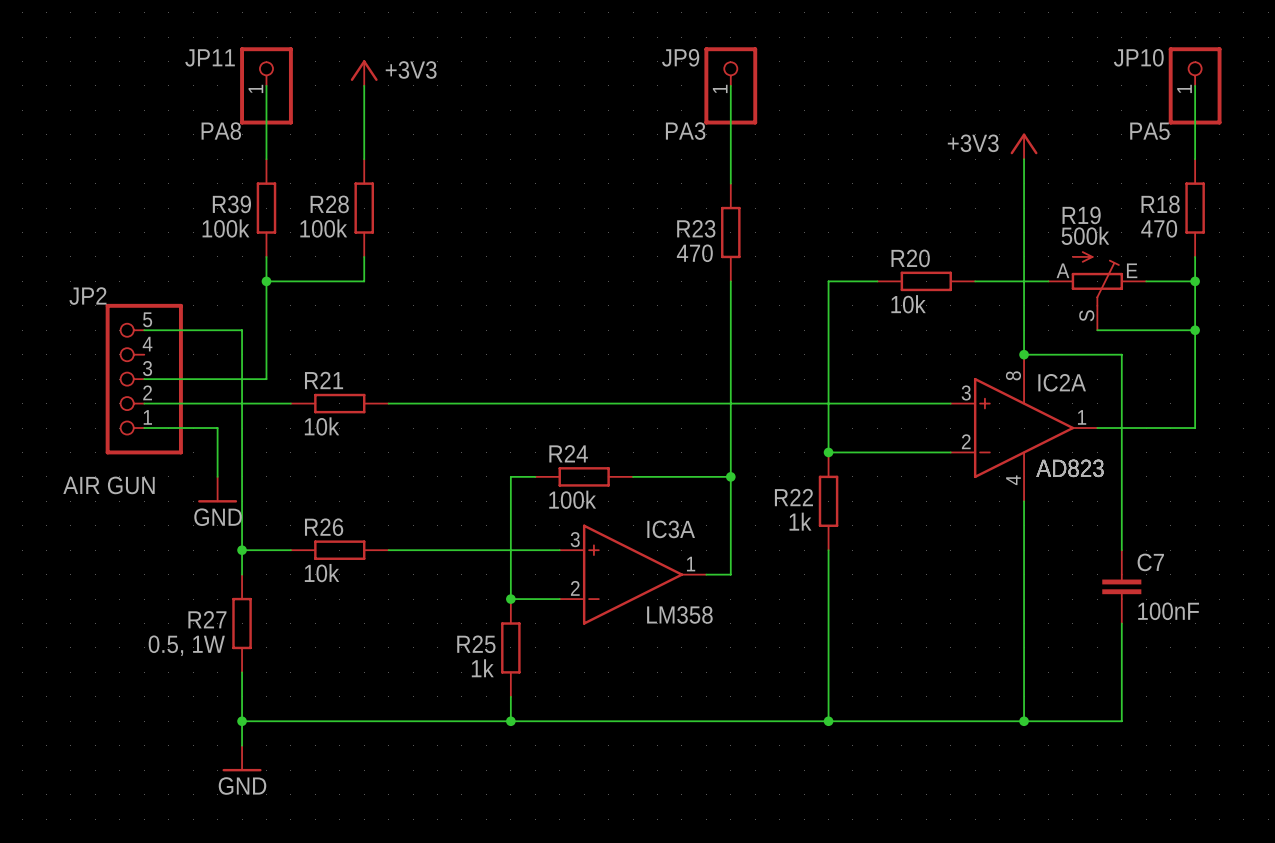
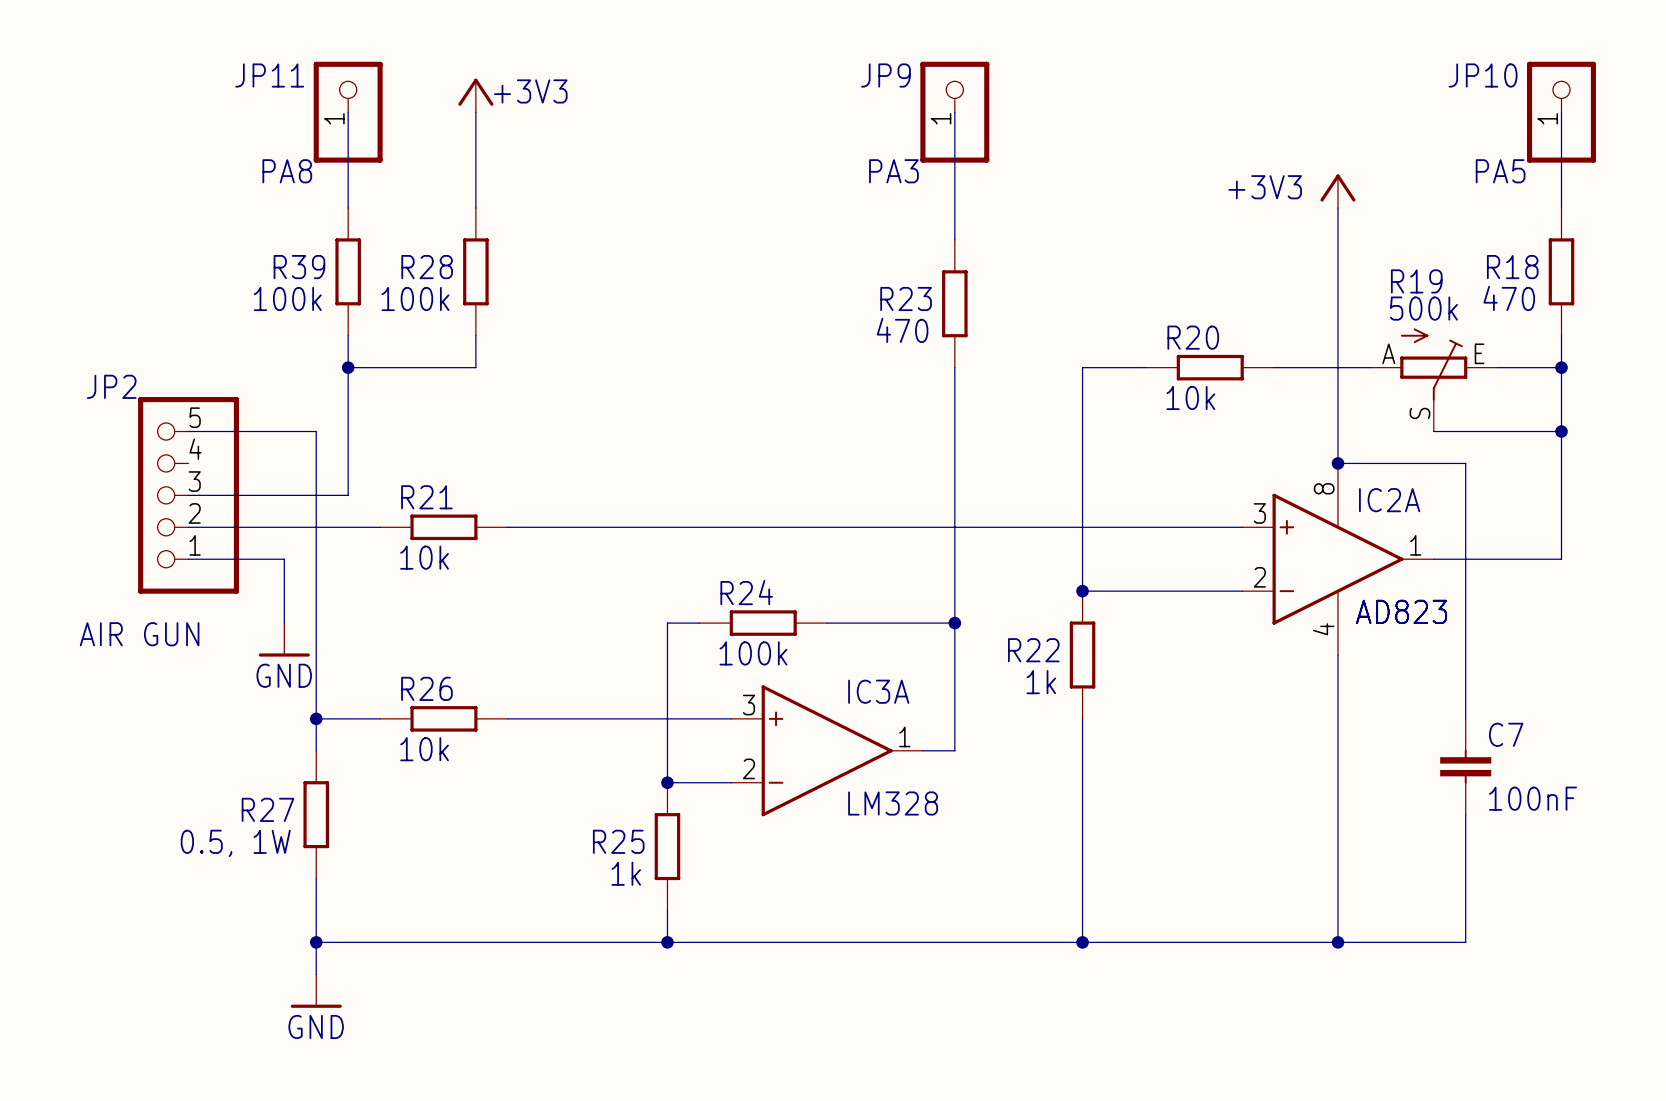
IC3A value: LM358 (679, 614) -> LM328 (893, 803)

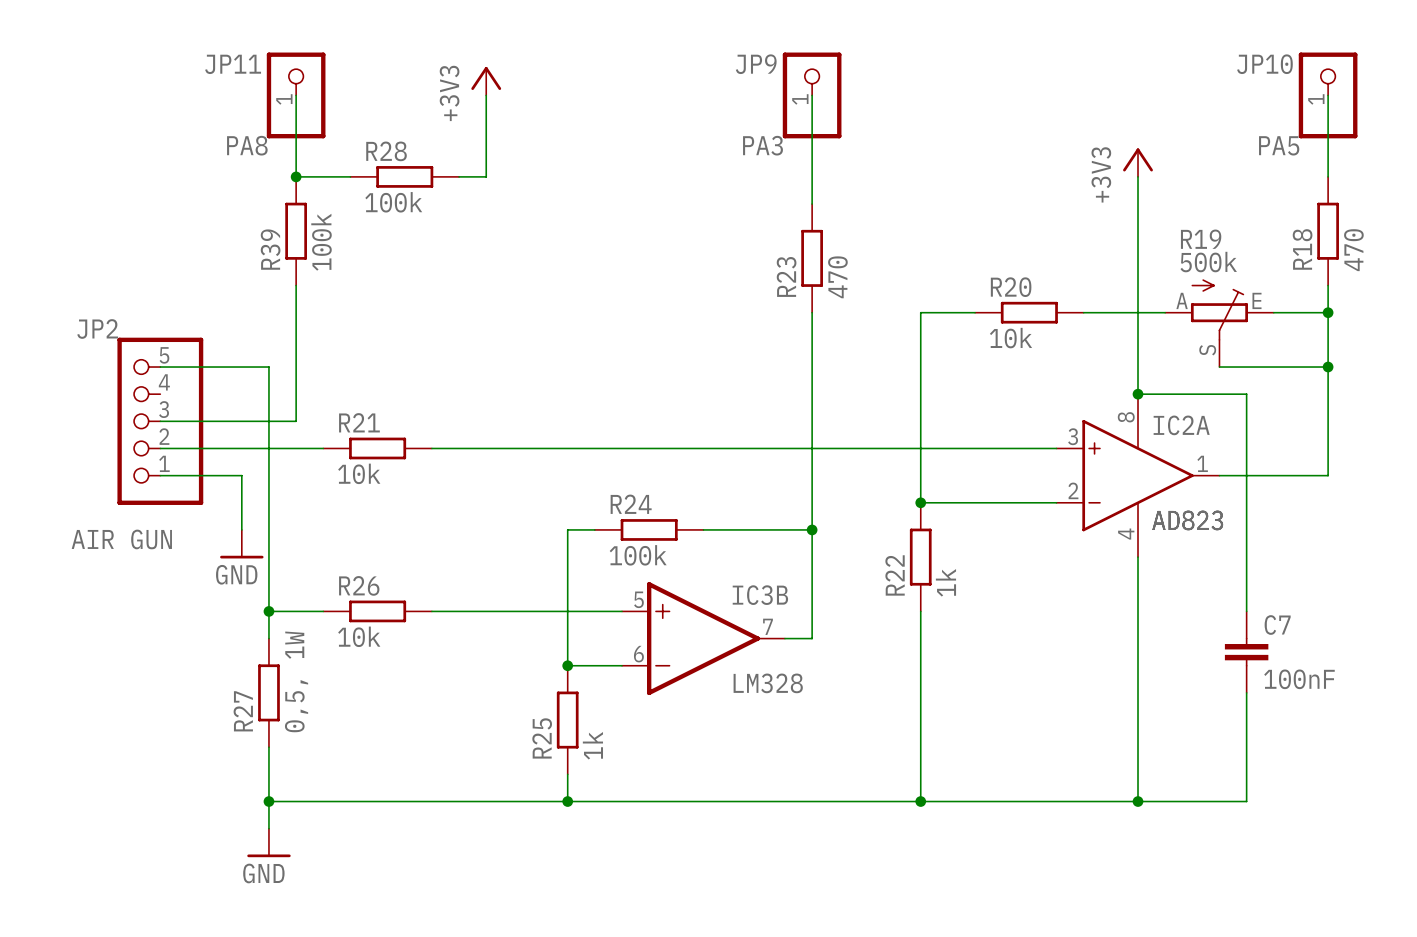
power symbol text rotation: 0° (530, 91) -> 90° counterclockwise (449, 93)
power symbol position: +3V3 (475, 95) -> +3V3 (486, 81)
wire: (475, 112) (475, 208) -> none
wire: none -> (486, 95) (486, 176) (459, 176)
power symbol text rotation: 0° (1265, 187) -> 90° counterclockwise (1101, 174)
wire: none -> (296, 176) (350, 176)
junction: none -> (296, 176)
R39 name rotation: 0° (299, 267) -> 90° counterclockwise (270, 249)
R28 name position: R28 (427, 267) -> R28 (386, 151)
R18 name rotation: 0° (1512, 267) -> 90° counterclockwise (1302, 249)
R28 rotation: 0° (475, 271) -> 90° clockwise (404, 176)
R18 value rotation: 0° (1509, 298) -> 90° counterclockwise (1353, 250)
R18 value position: 470 (1509, 298) -> 470 (1353, 250)
R39 value rotation: 0° (287, 299) -> 90° counterclockwise (321, 242)
R39 value position: 100k (287, 299) -> 100k (321, 242)
R28 value position: 100k (415, 299) -> 100k (393, 202)
R23 name rotation: 0° (906, 299) -> 90° counterclockwise (786, 276)
R23 value rotation: 0° (902, 330) -> 90° counterclockwise (837, 277)
R23 value position: 470 (902, 330) -> 470 (837, 277)
wire: (475, 335) (475, 367) (348, 367) -> none
junction: (348, 367) -> none
R22 name rotation: 0° (1033, 650) -> 90° counterclockwise (895, 575)
R22 value rotation: 0° (1041, 682) -> 90° counterclockwise (945, 582)
R22 value position: 1k (1041, 682) -> 1k (945, 582)
IC3A: LM328 (827, 750) -> none
IC3B: none -> LM328 (703, 638)
R27 name rotation: 0° (267, 809) -> 90° counterclockwise (243, 711)
R25 name rotation: 0° (618, 841) -> 90° counterclockwise (542, 738)
R27 value: 0.5, 1W (235, 843) -> 0,5, 1W (296, 681)
R25 value rotation: 0° (626, 873) -> 90° counterclockwise (592, 745)
R25 value position: 1k (626, 873) -> 1k (592, 745)

